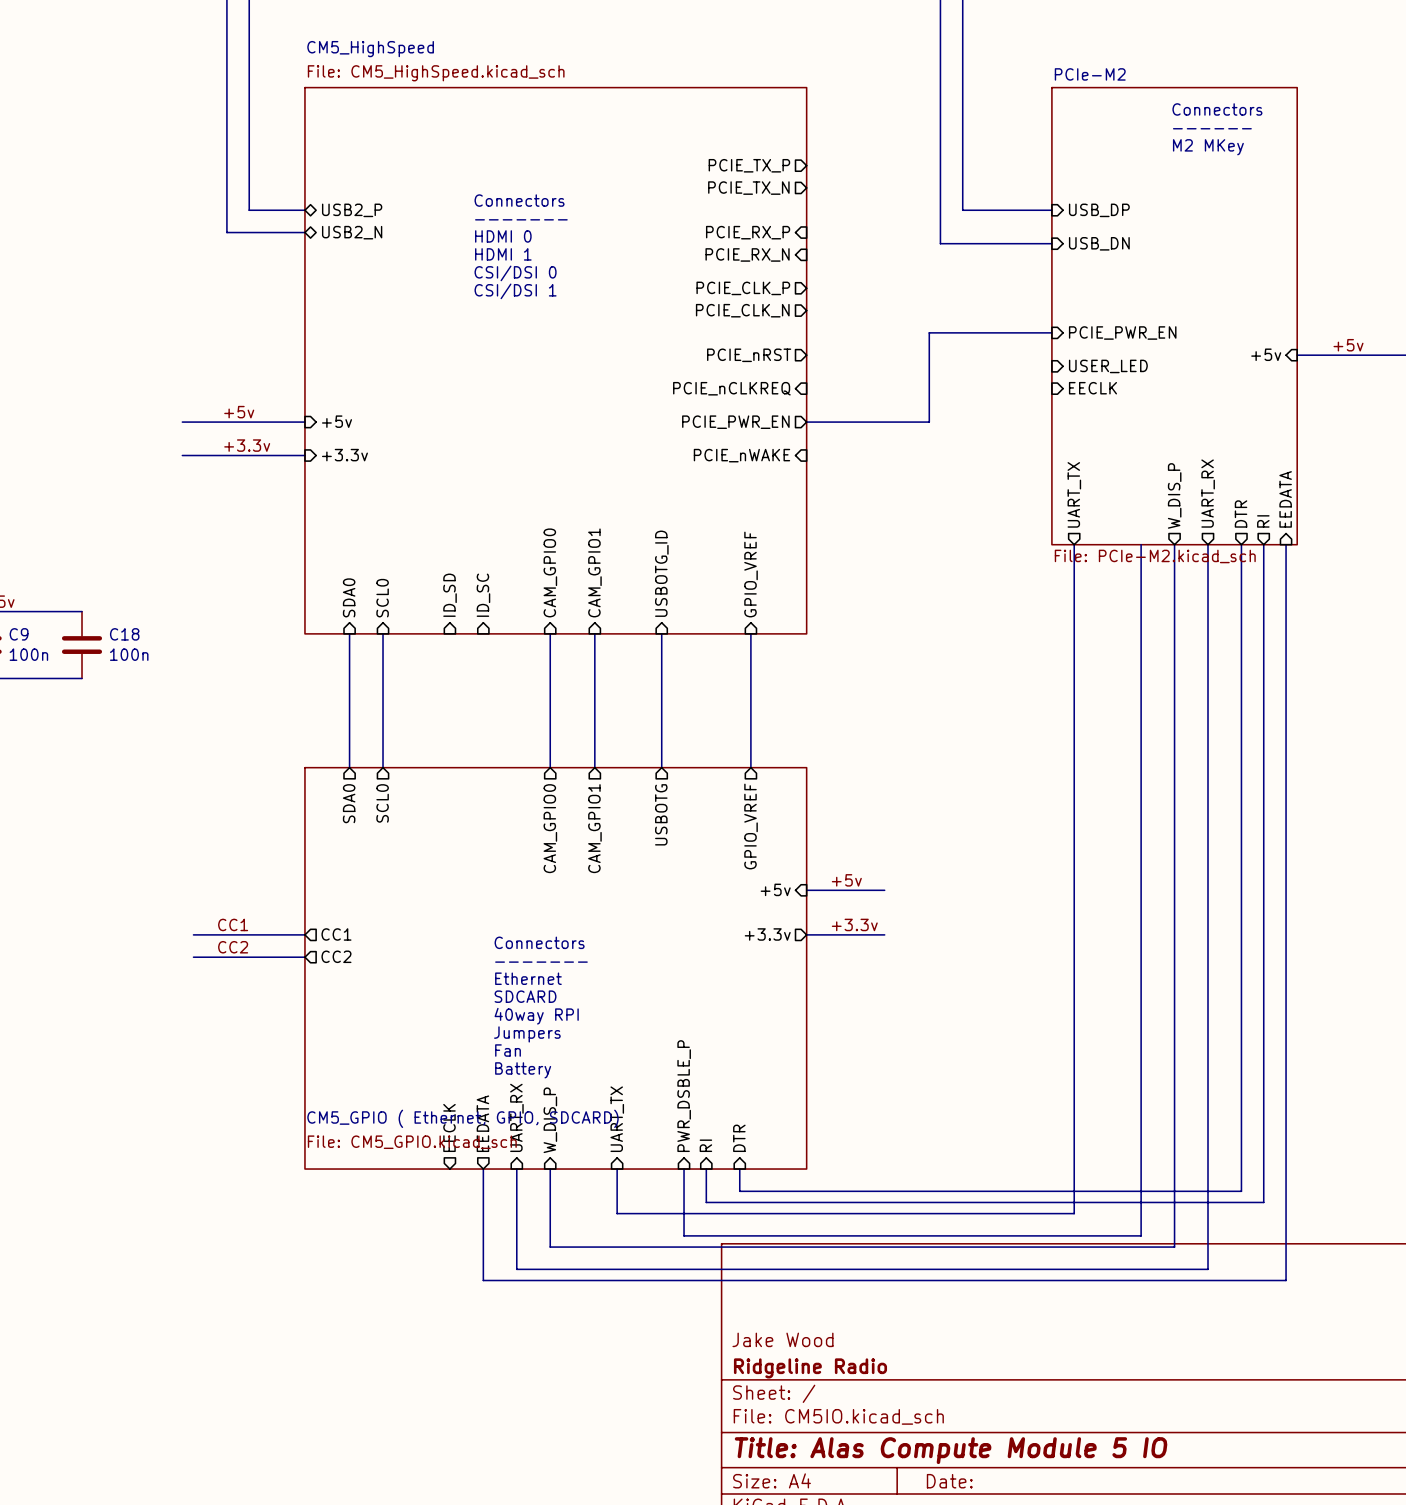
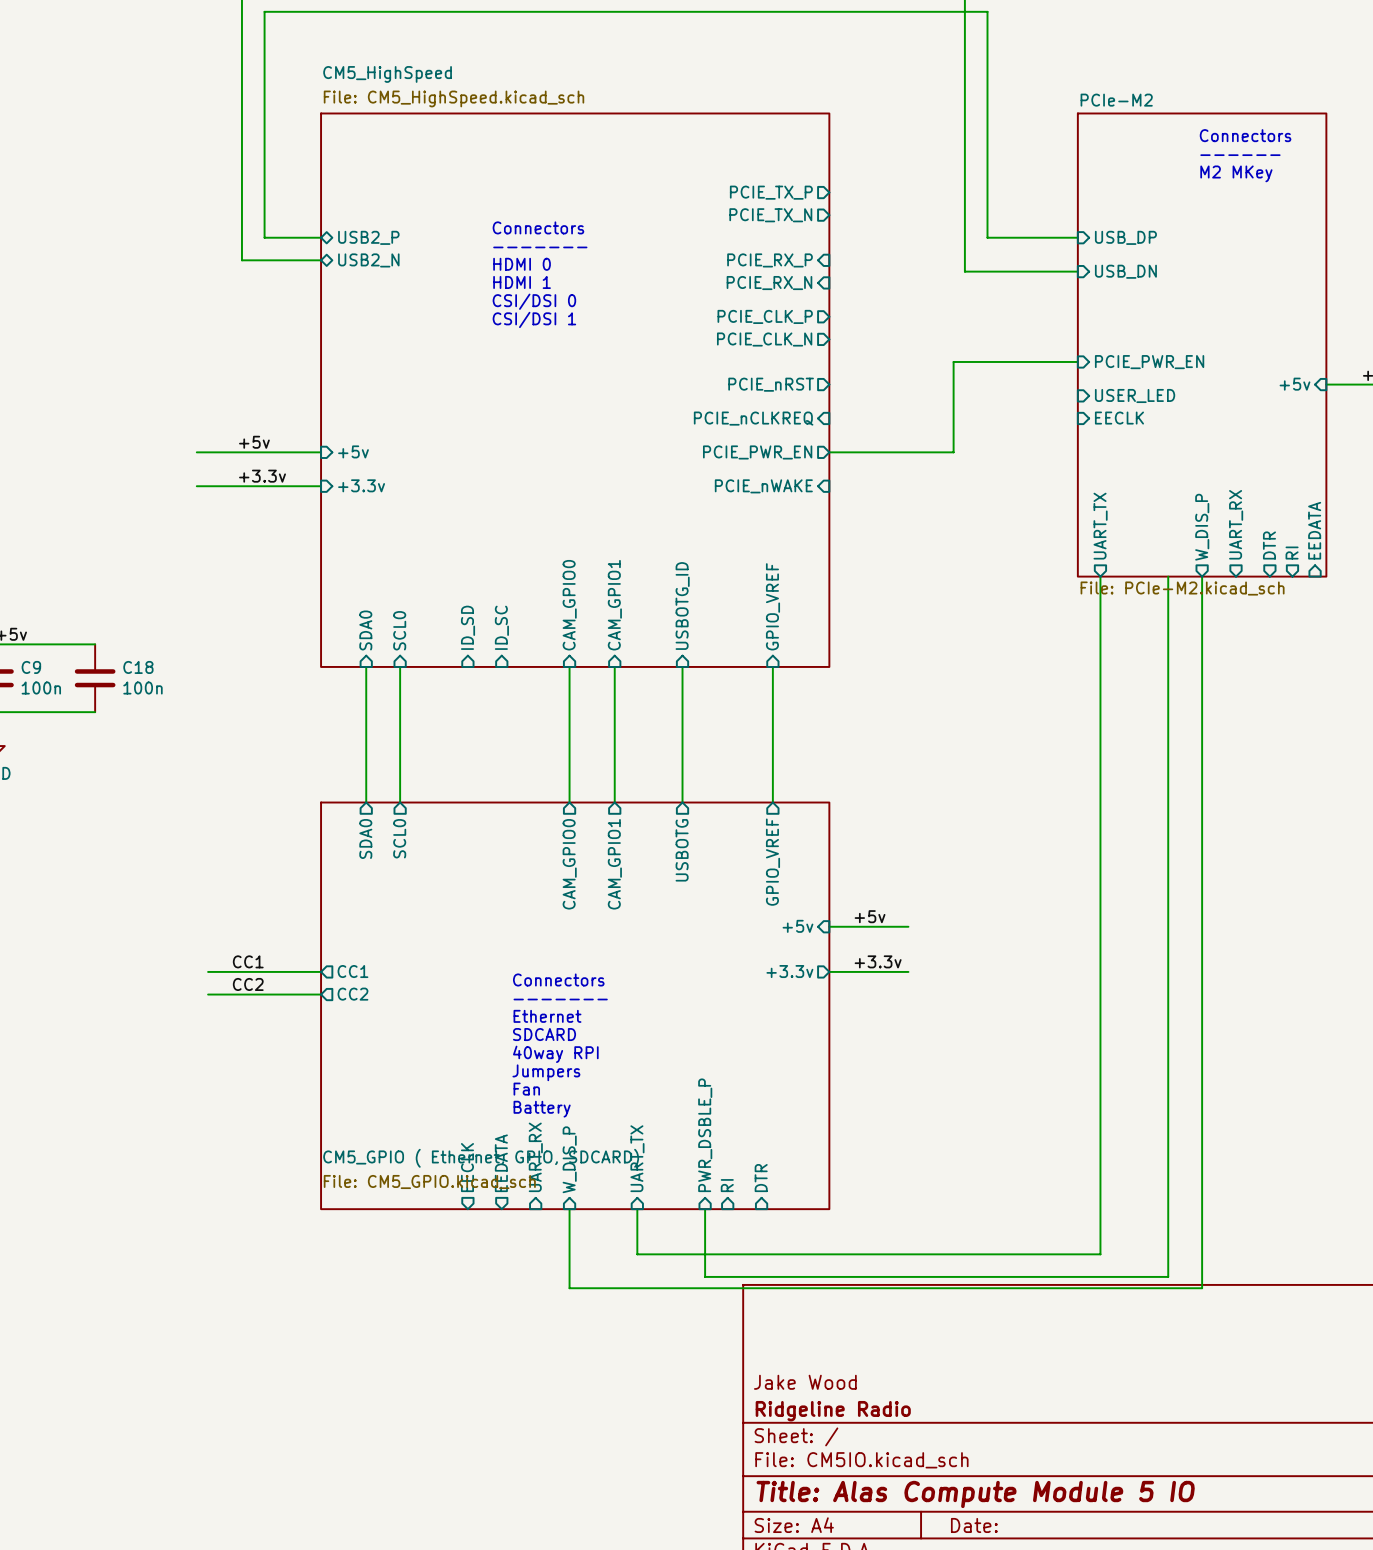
wire: (1208, 544) (1208, 1269) (516, 1269) (516, 1169) -> none
wire: (1241, 544) (1241, 1191) (739, 1191) (739, 1169) -> none
wire: (1263, 544) (1263, 1202) (706, 1202) (706, 1169) -> none
wire: (1286, 544) (1286, 1280) (483, 1280) (483, 1169) -> none

